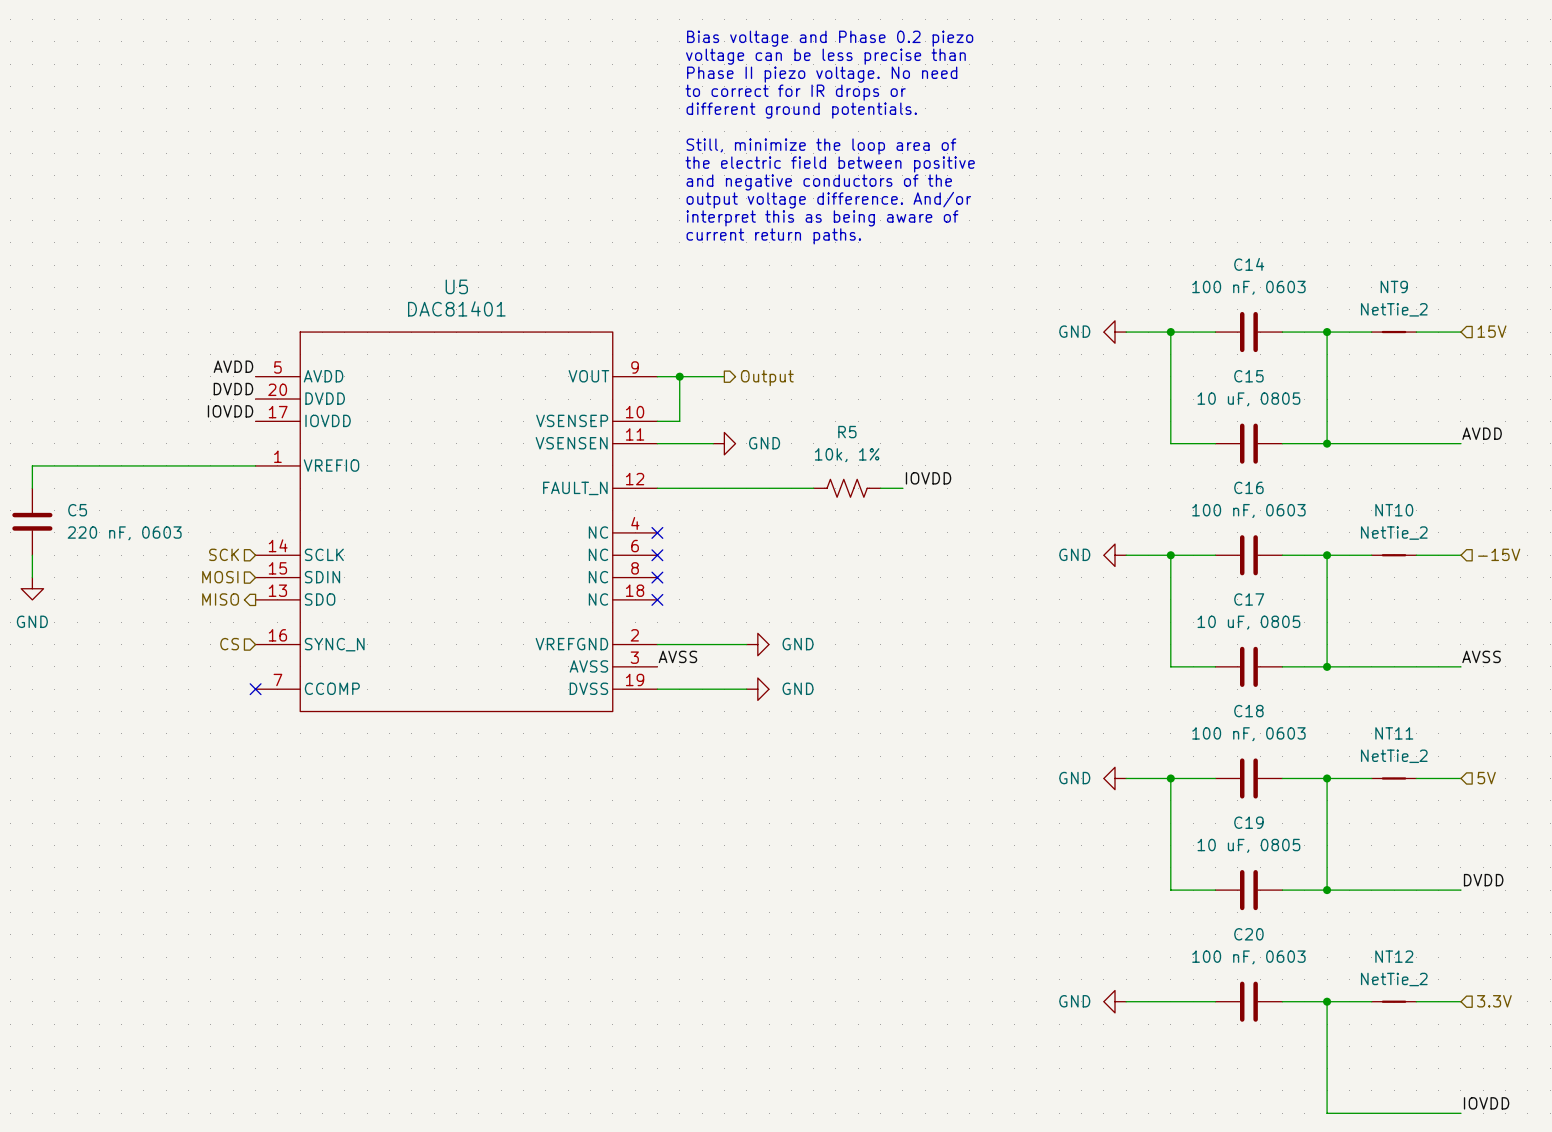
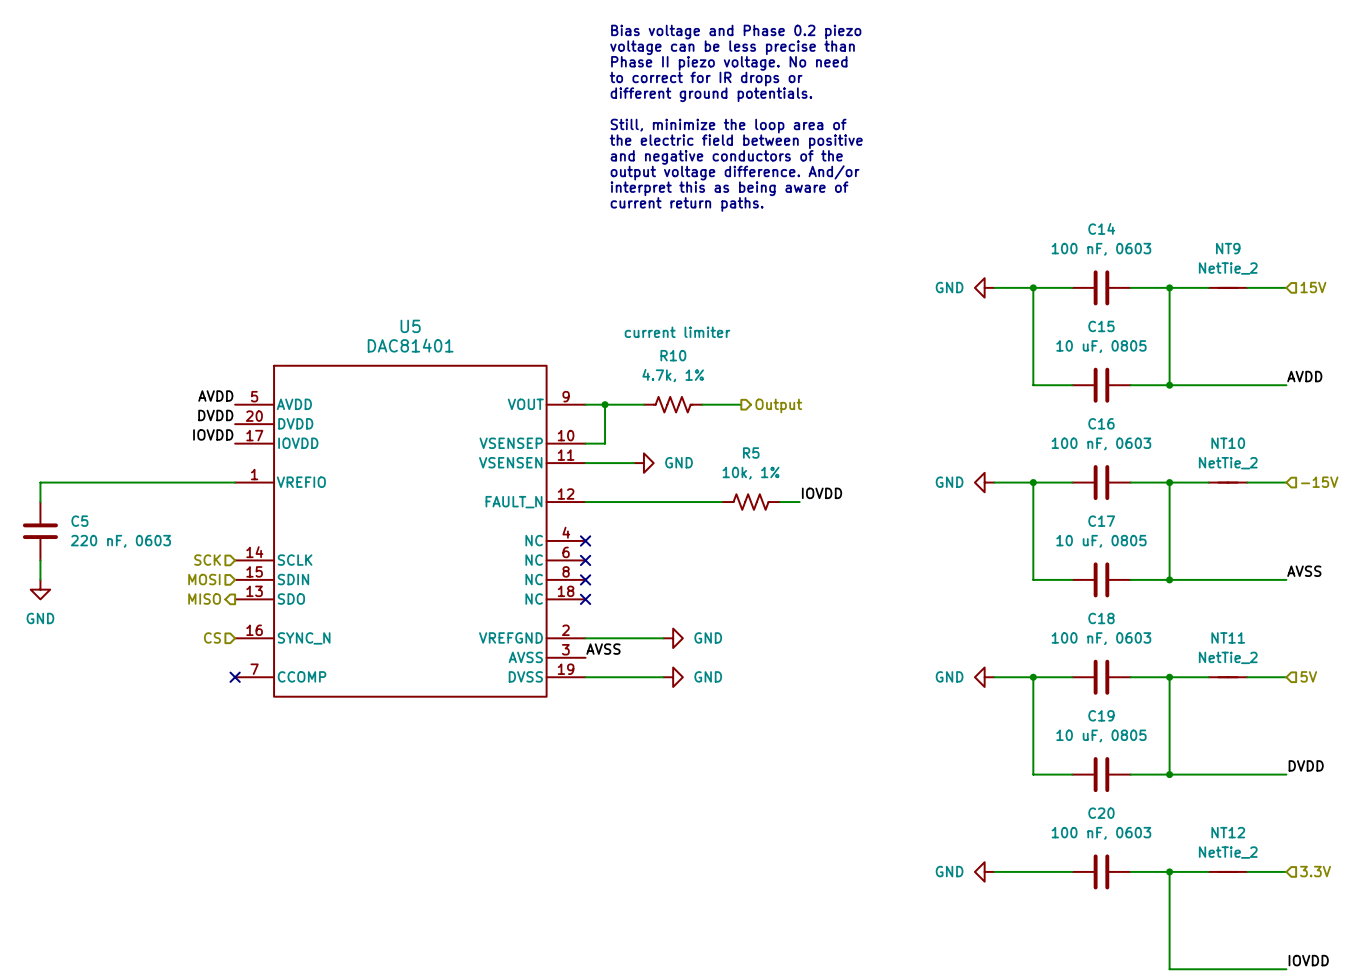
label position: AVDD (233, 366) -> AVDD (215, 396)
wire: (657, 376) (724, 376) -> (585, 404) (643, 404)
wire: (679, 376) (679, 421) (657, 421) -> (605, 404) (605, 443) (585, 443)
junction: (679, 376) -> none
hierarchical label position: Output (767, 378) -> Output (778, 405)
label position: DVDD (233, 389) -> DVDD (215, 415)
label position: IOVDD (230, 411) -> IOVDD (213, 434)
wire: (657, 443) (713, 443) -> (585, 463) (634, 463)
power symbol: GND (724, 443) -> none
wire: (255, 465) (32, 465) (32, 488) -> none
junction: none -> (605, 404)
R10: none -> 4.7k, 1% (673, 404)
wire: none -> (702, 404) (741, 404)
label position: IOVDD (928, 478) -> IOVDD (822, 493)
wire: (657, 488) (813, 488) -> (585, 502) (721, 502)
R5 position: (847, 488) -> (751, 502)
wire: (880, 488) (902, 488) -> (780, 502) (799, 502)
C5 position: (32, 521) -> (40, 531)
U5 position: (456, 521) -> (410, 531)
no-connect mark: (657, 532) -> none
power symbol: none -> GND (643, 463)
hierarchical label: SCK (224, 554) -> none
wire: none -> (40, 482) (235, 482)
no-connect mark: (657, 555) -> none
hierarchical label position: MOSI (220, 577) -> MOSI (204, 579)
no-connect mark: (657, 577) -> none
power symbol position: GND (32, 588) -> GND (40, 589)
hierarchical label position: MISO (220, 599) -> MISO (204, 599)
no-connect mark: (657, 599) -> none
no-connect mark: none -> (585, 540)
wire: none -> (40, 560) (40, 579)
hierarchical label: CS (229, 644) -> SCK (207, 560)
wire: (657, 644) (746, 644) -> (585, 638) (663, 638)
no-connect mark: none -> (585, 560)
power symbol: GND (757, 644) -> none
label position: AVSS (677, 656) -> AVSS (603, 649)
no-connect mark: none -> (585, 579)
no-connect mark: (255, 689) -> none
wire: (657, 689) (746, 689) -> (585, 677) (663, 677)
no-connect mark: none -> (585, 599)
power symbol: GND (757, 689) -> none
hierarchical label: none -> CS (212, 637)
power symbol: none -> GND (673, 638)
no-connect mark: none -> (235, 677)
power symbol: none -> GND (673, 677)

